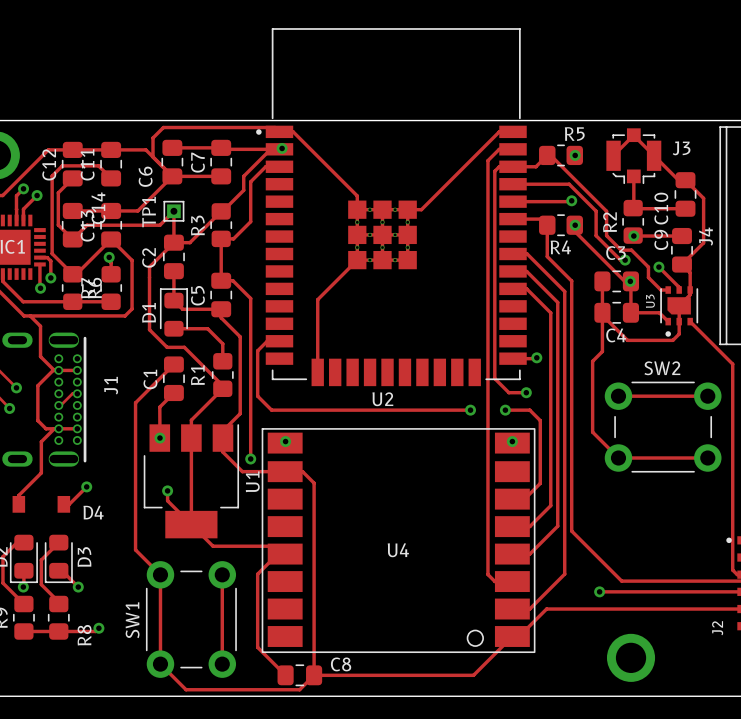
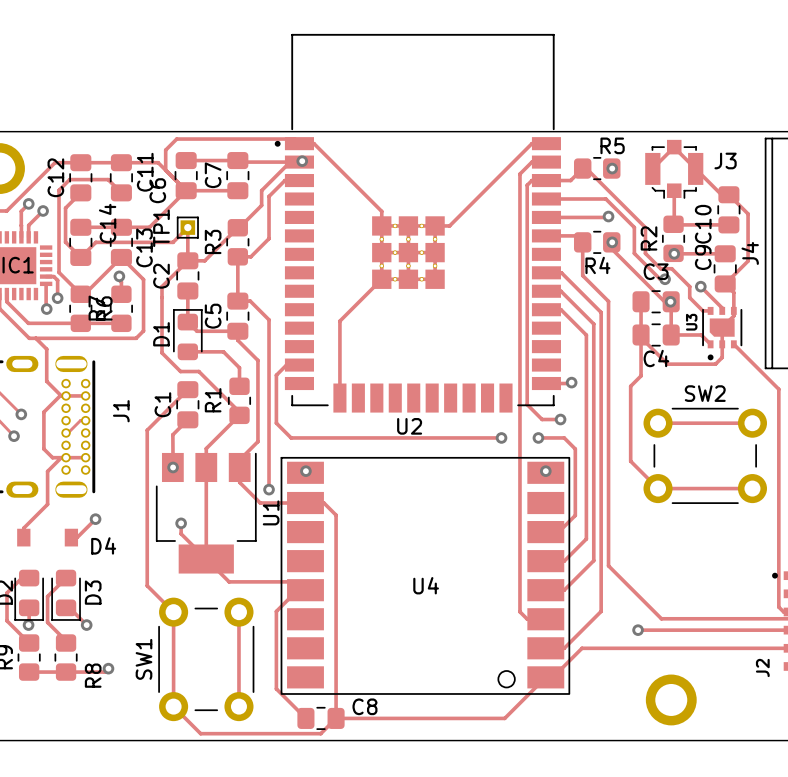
C11 name position: C11 (87, 164) -> C11 (145, 172)
C13 name position: C13 (87, 225) -> C13 (144, 247)

